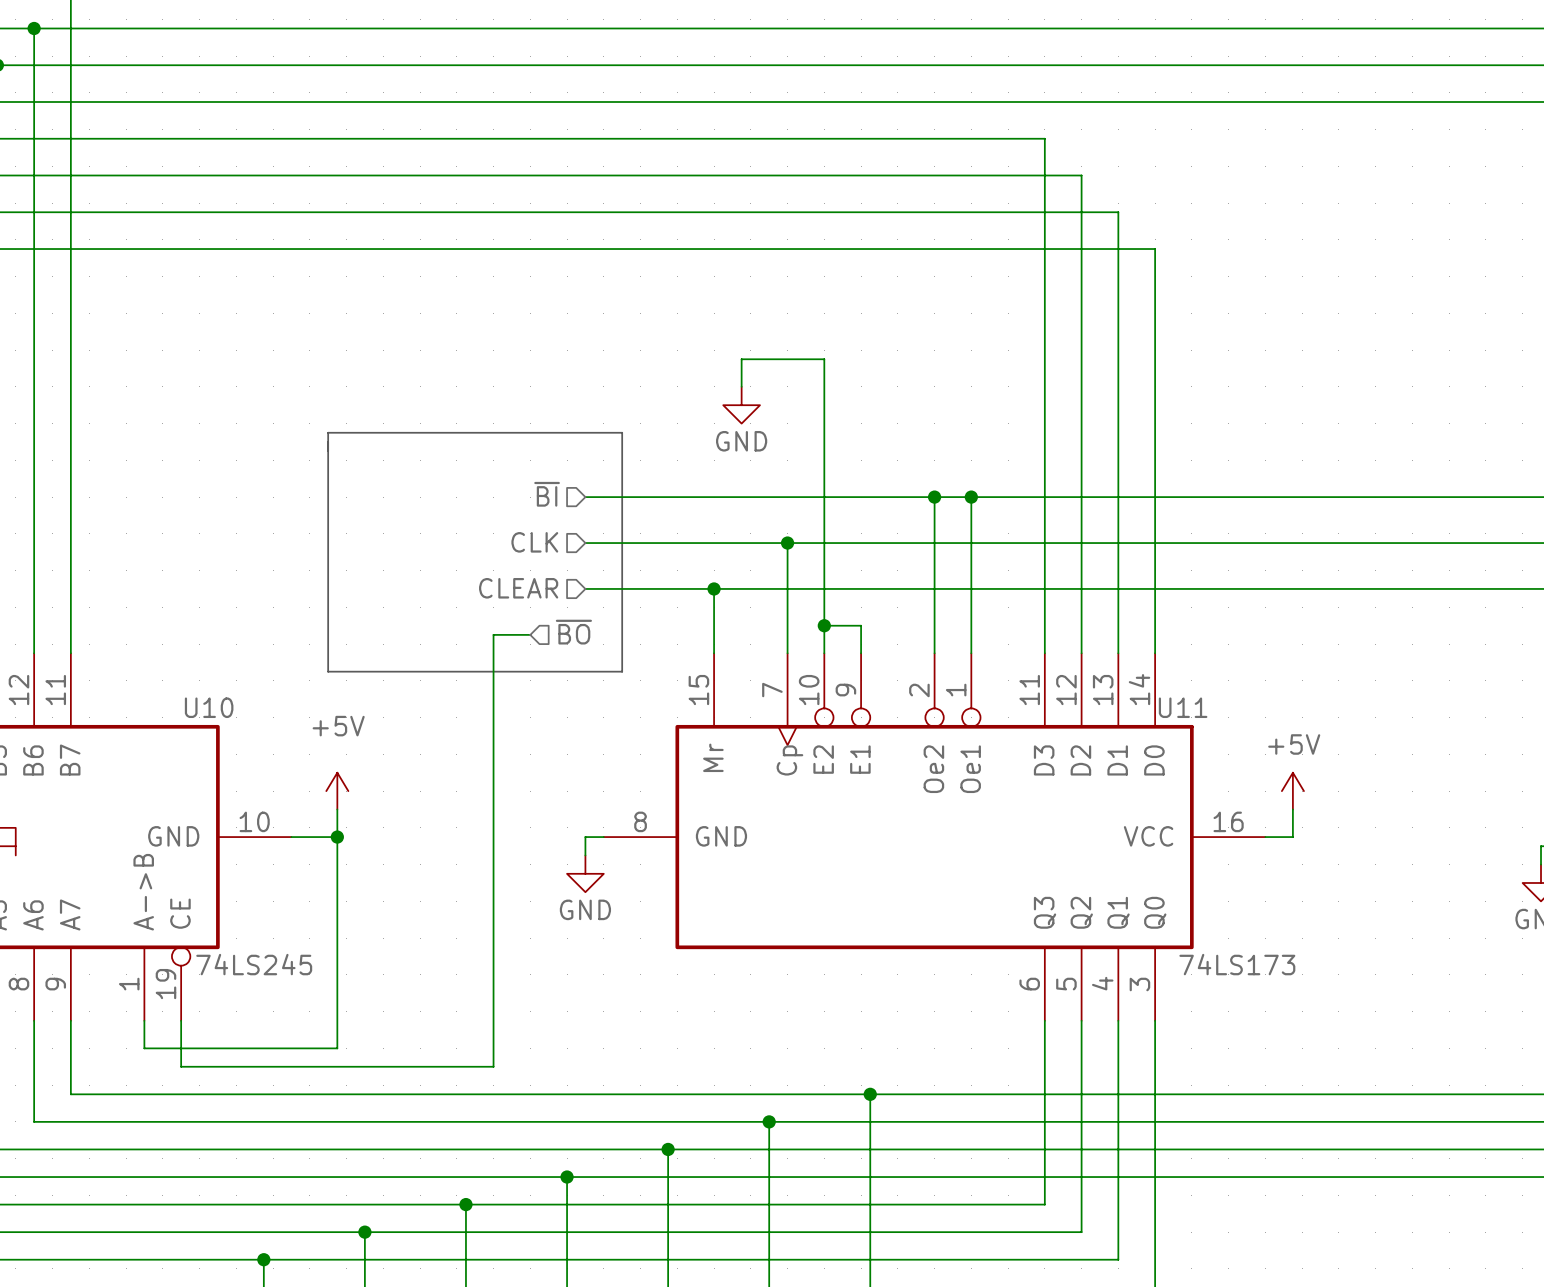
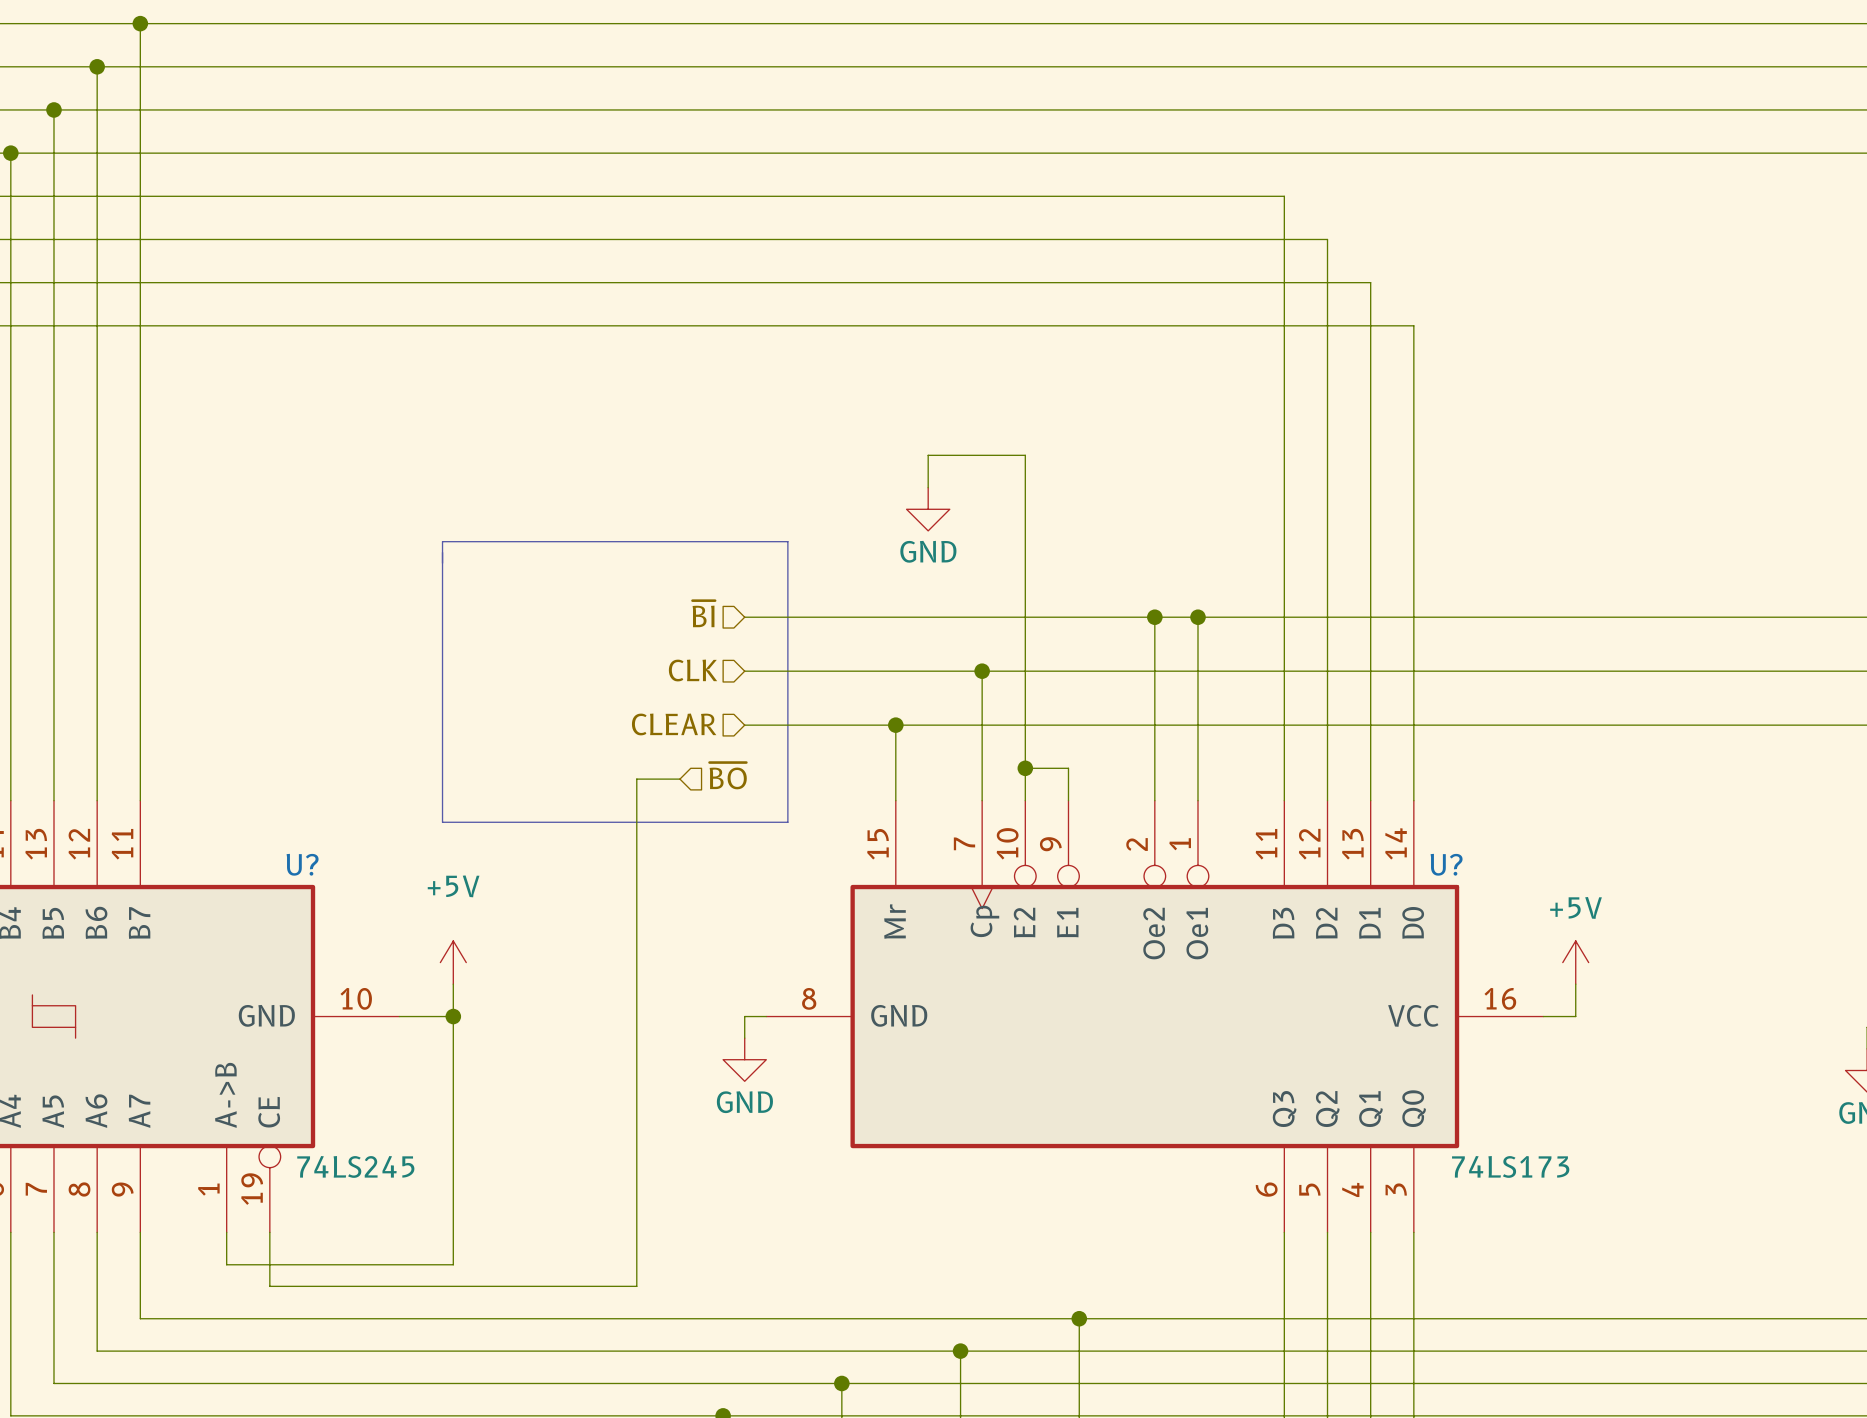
U10 name: U10 (209, 707) -> U? (302, 864)
U11 name: U11 (1183, 707) -> U? (1446, 864)

